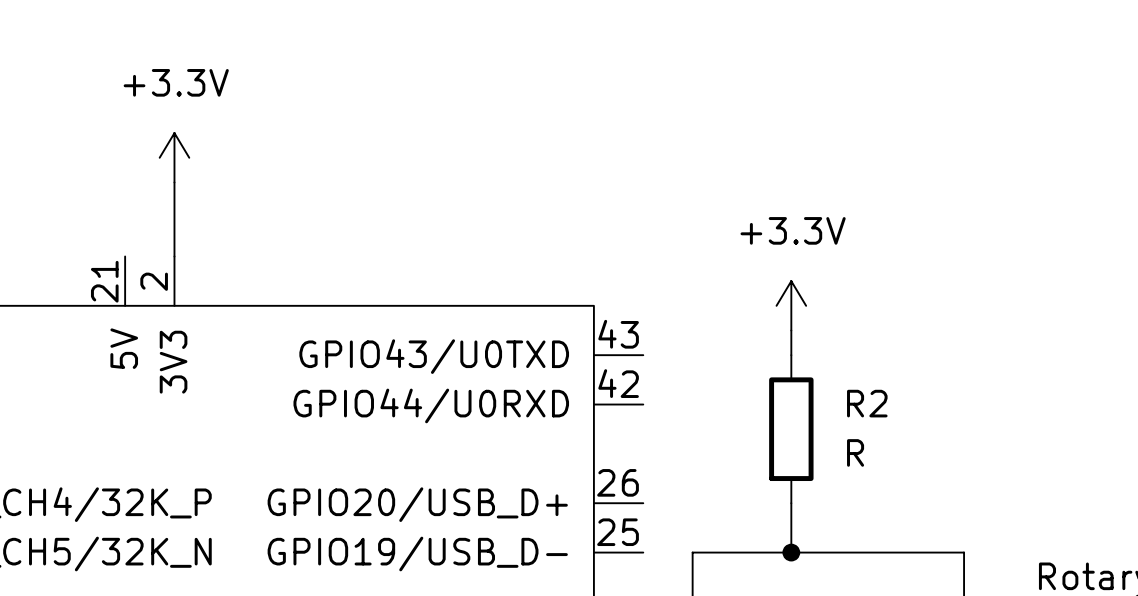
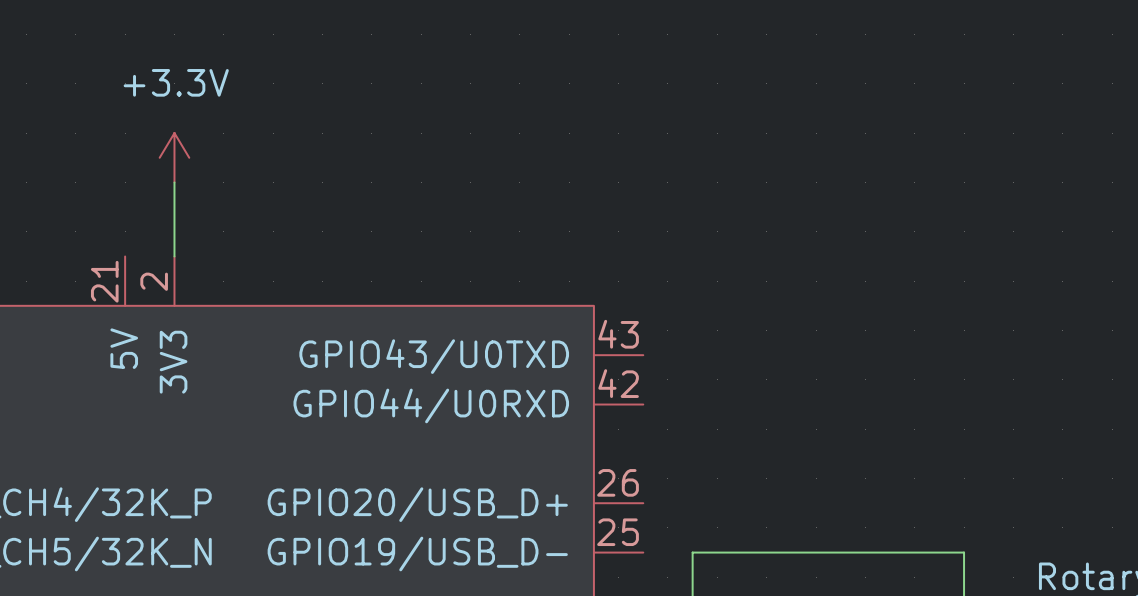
power symbol: +3.3V (791, 305) -> none
wire: (791, 330) (791, 355) -> none
R2: R (791, 429) -> none
wire: (791, 503) (791, 552) -> none
junction: (791, 552) -> none

